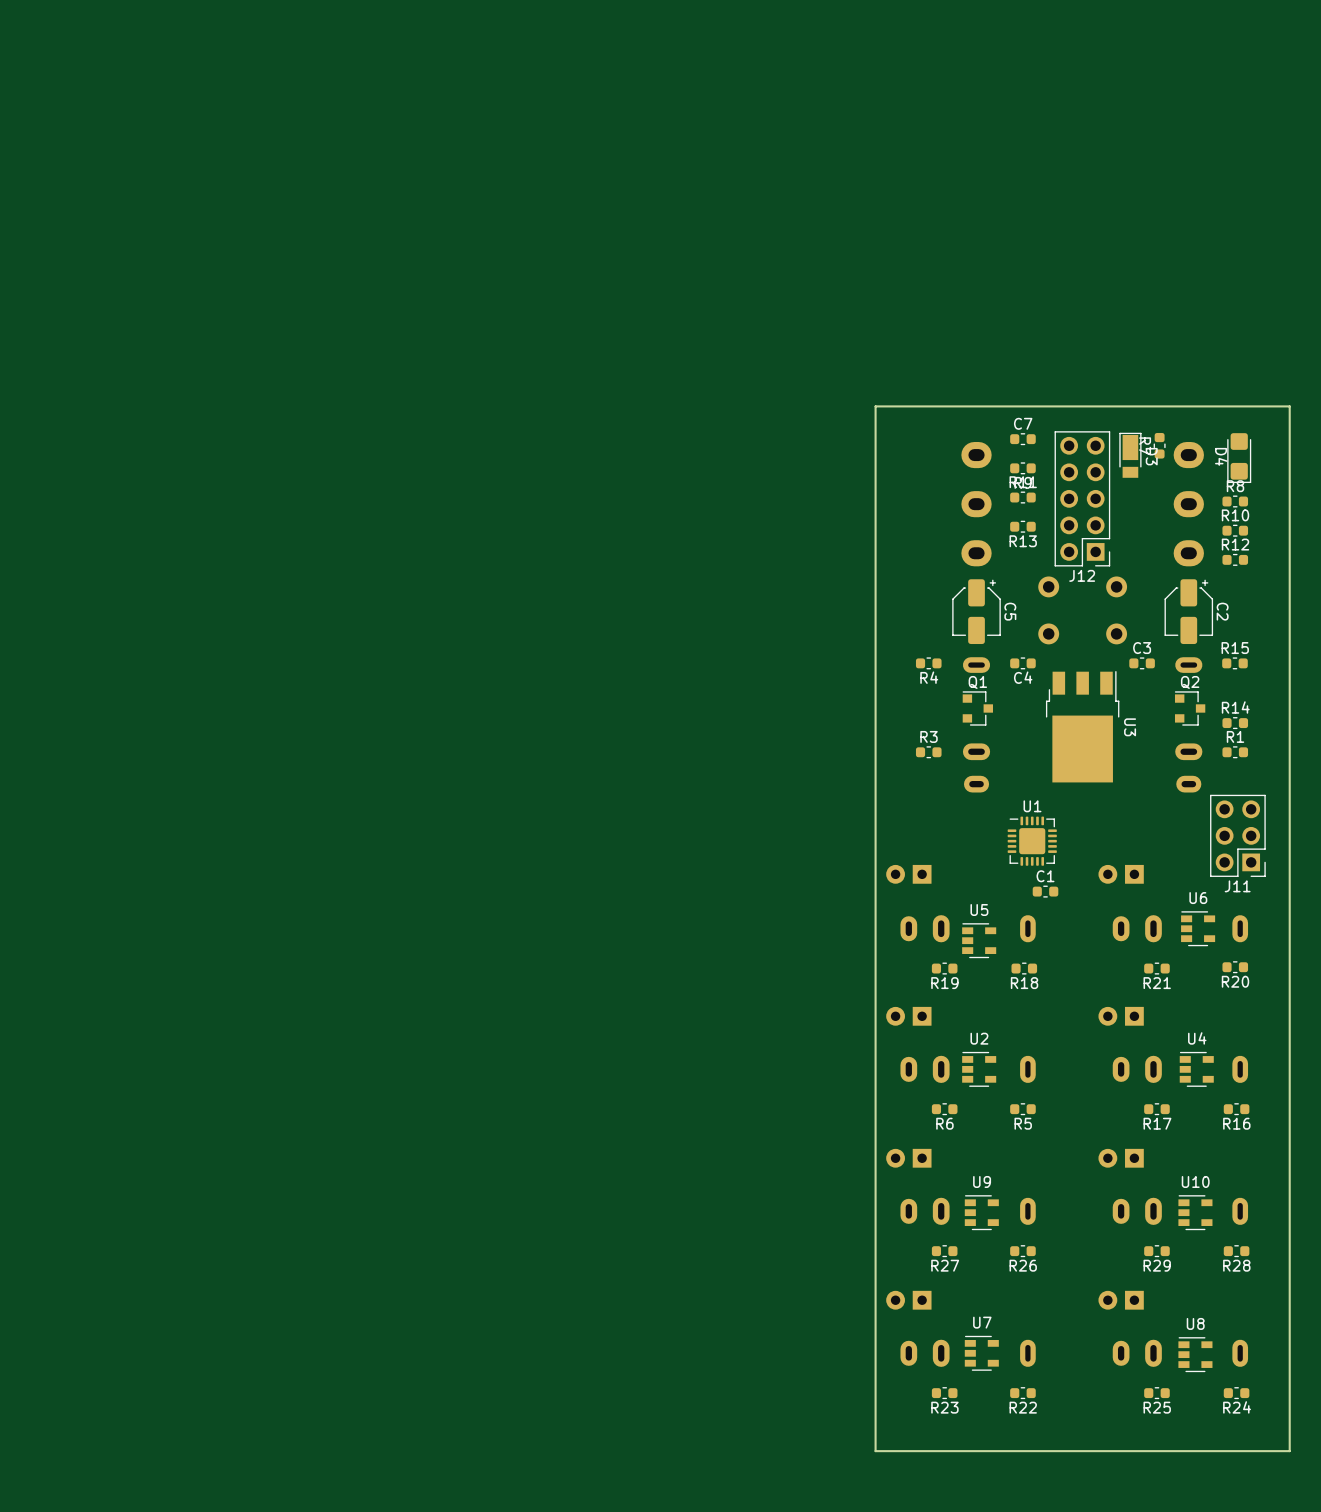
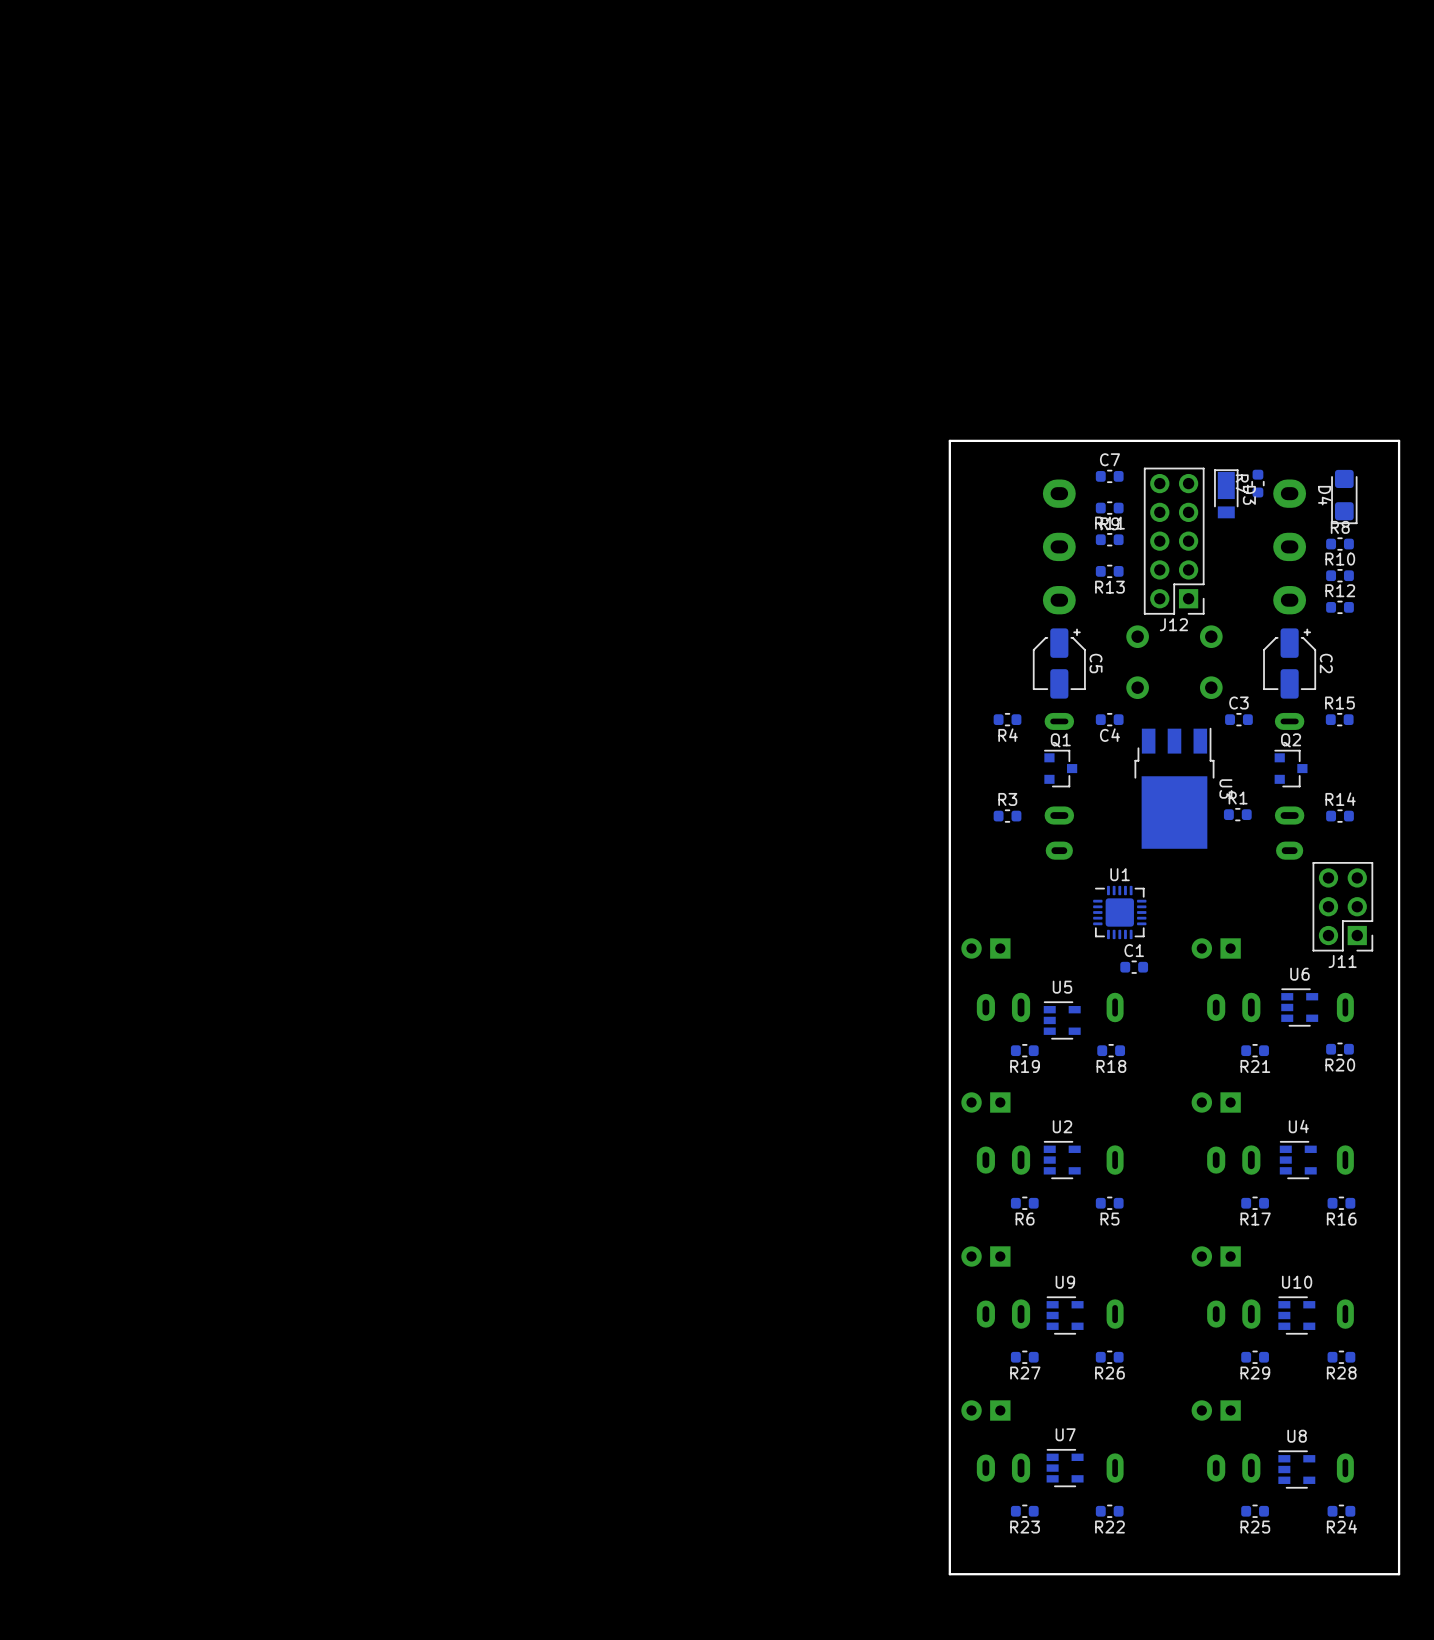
R14: (1235, 723) -> none
R1 name: R1 (1235, 736) -> R14 (1340, 799)
R1: none -> (1237, 814)

